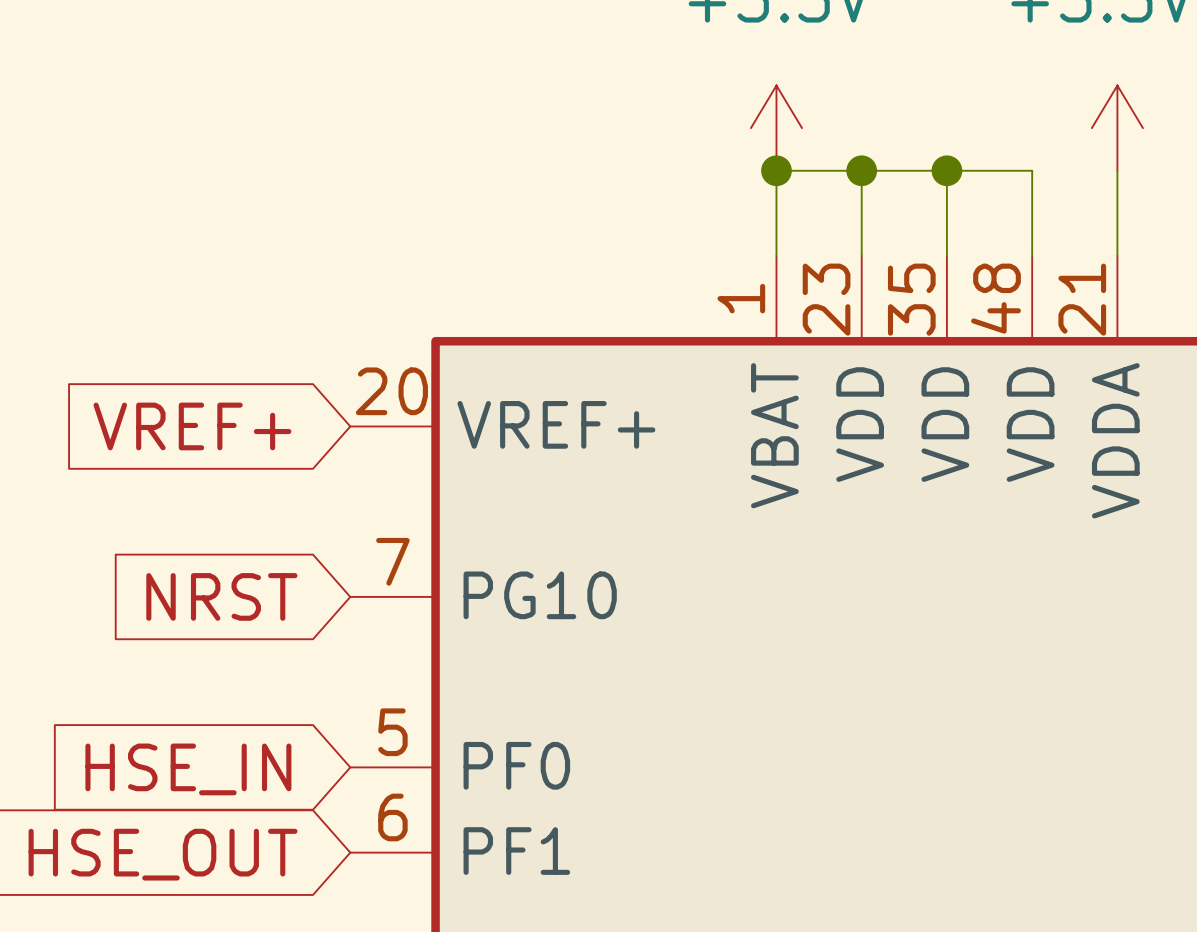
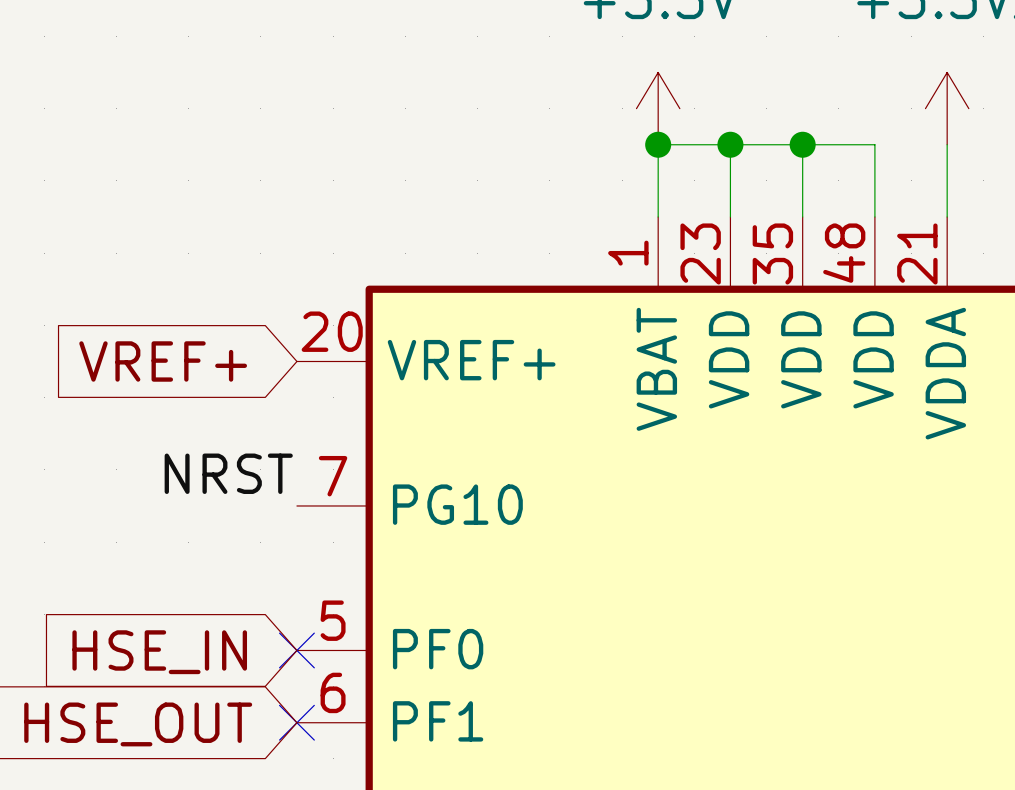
label: none -> NRST (228, 473)
global label: NRST (221, 596) -> none
no-connect mark: none -> (296, 650)
no-connect mark: none -> (296, 722)

